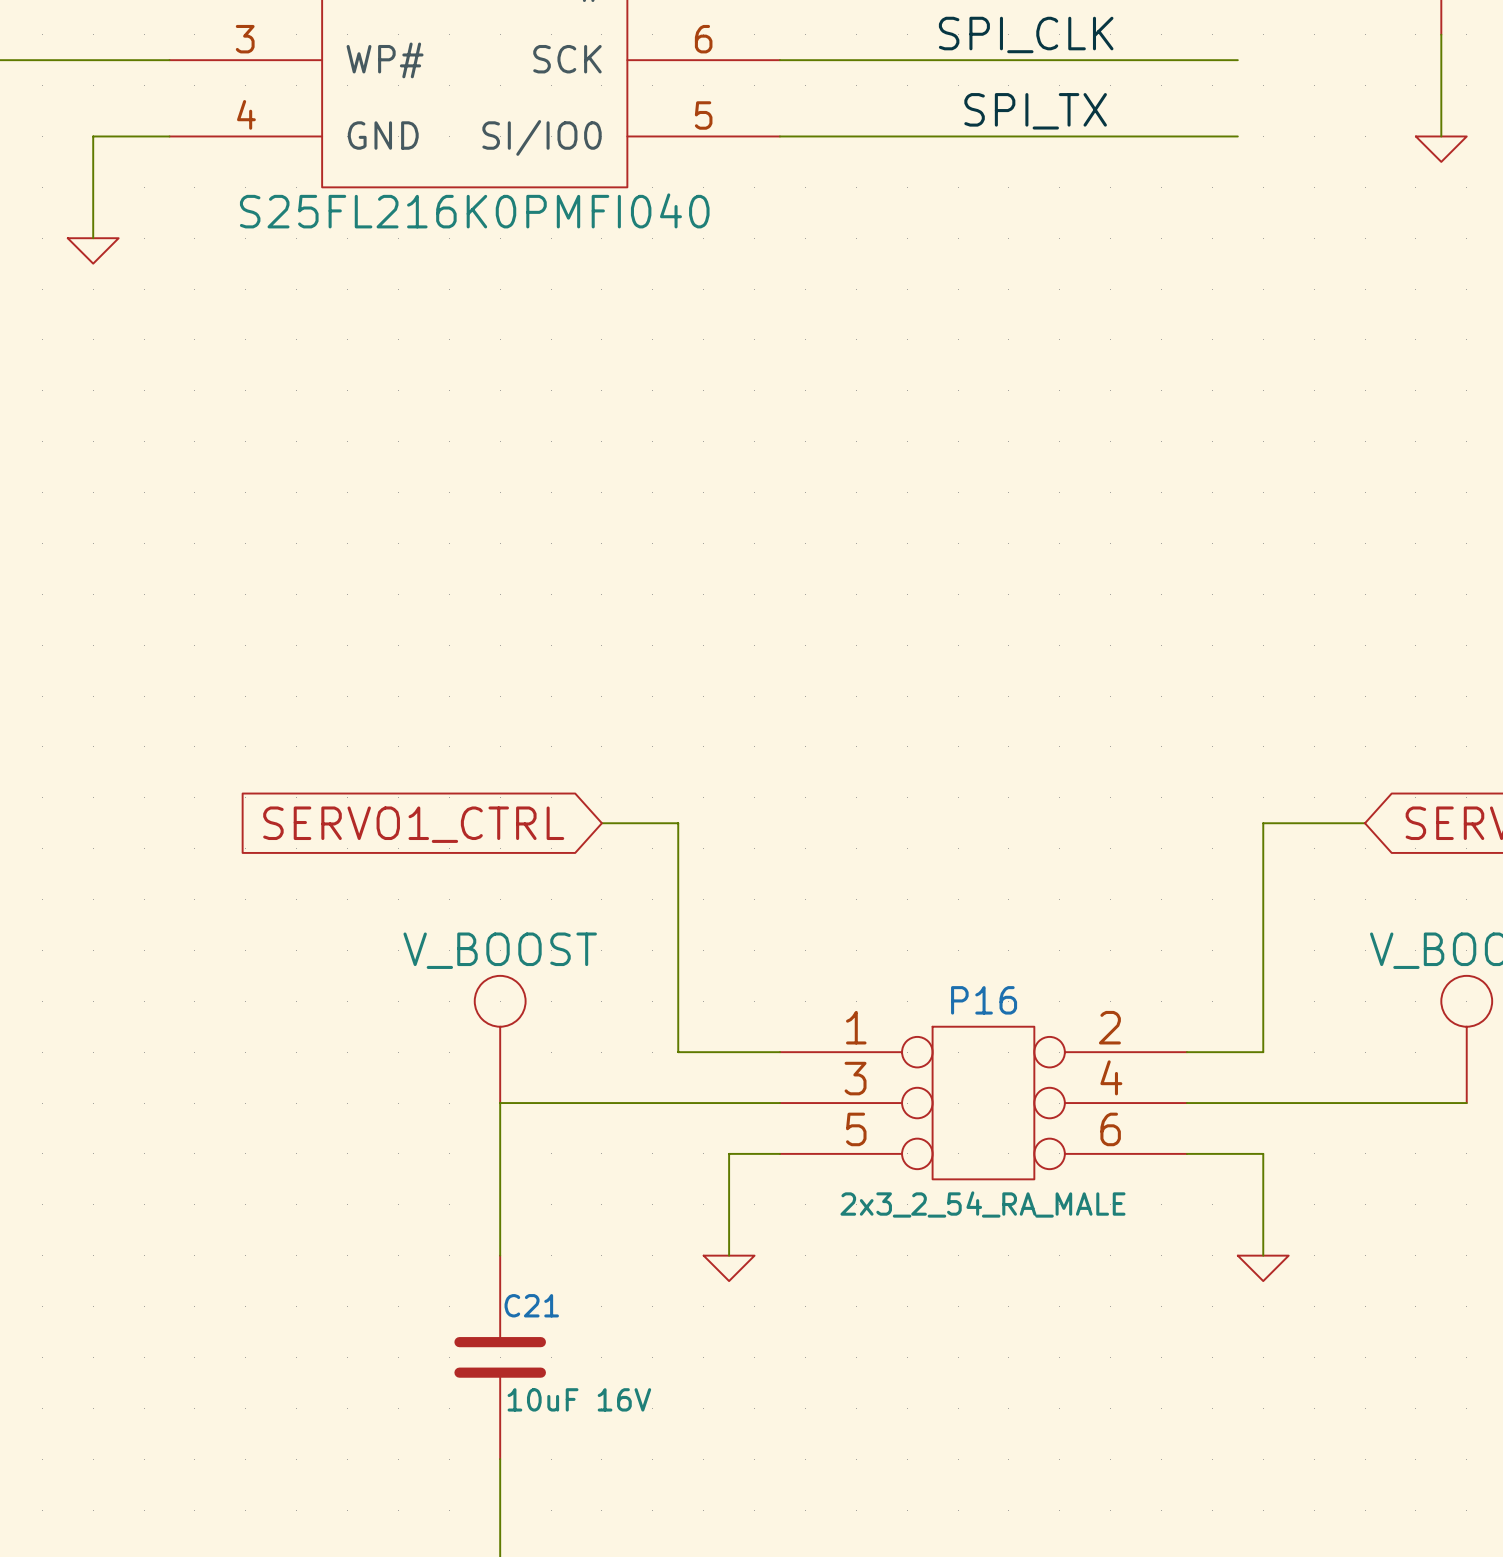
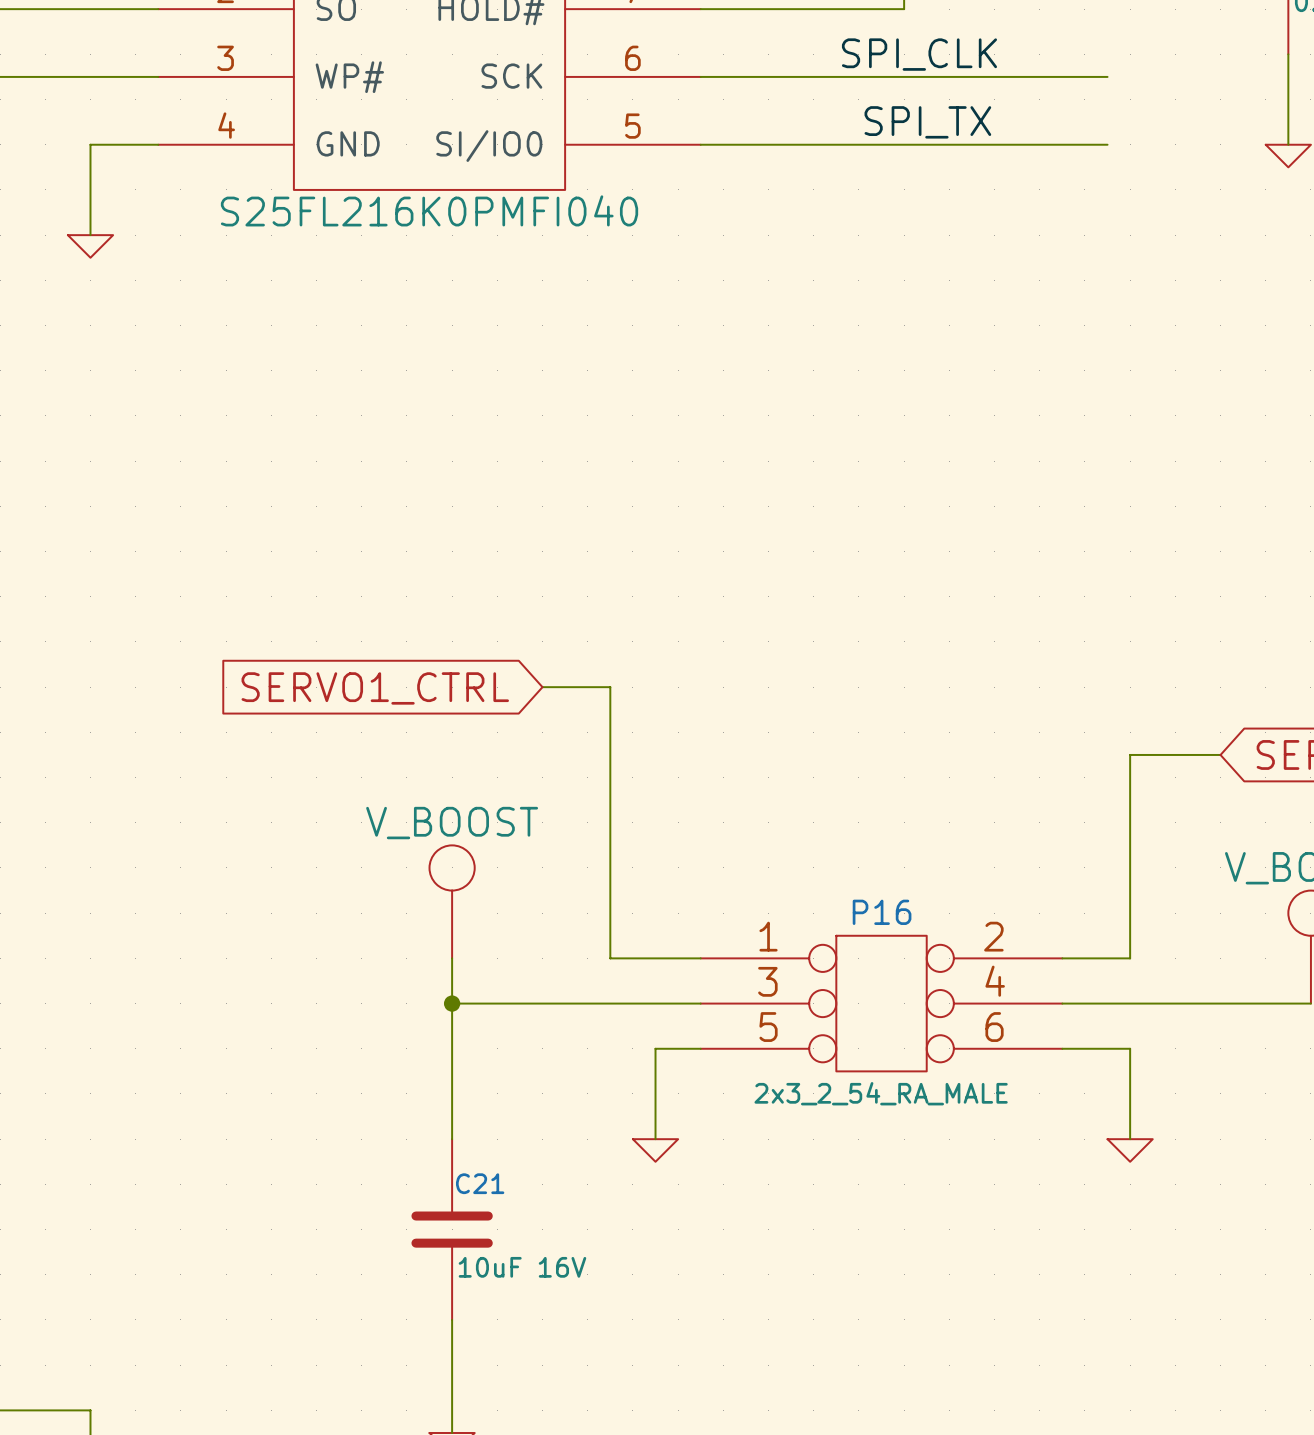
wire: (601, 823) (678, 823) -> (542, 687) (610, 687) (610, 754)
global label position: SERVO1_CTRL (413, 824) -> SERVO1_CTRL (375, 688)
power symbol position: V_BOOST (500, 1039) -> V_BOOST (452, 901)
junction: none -> (452, 1003)

